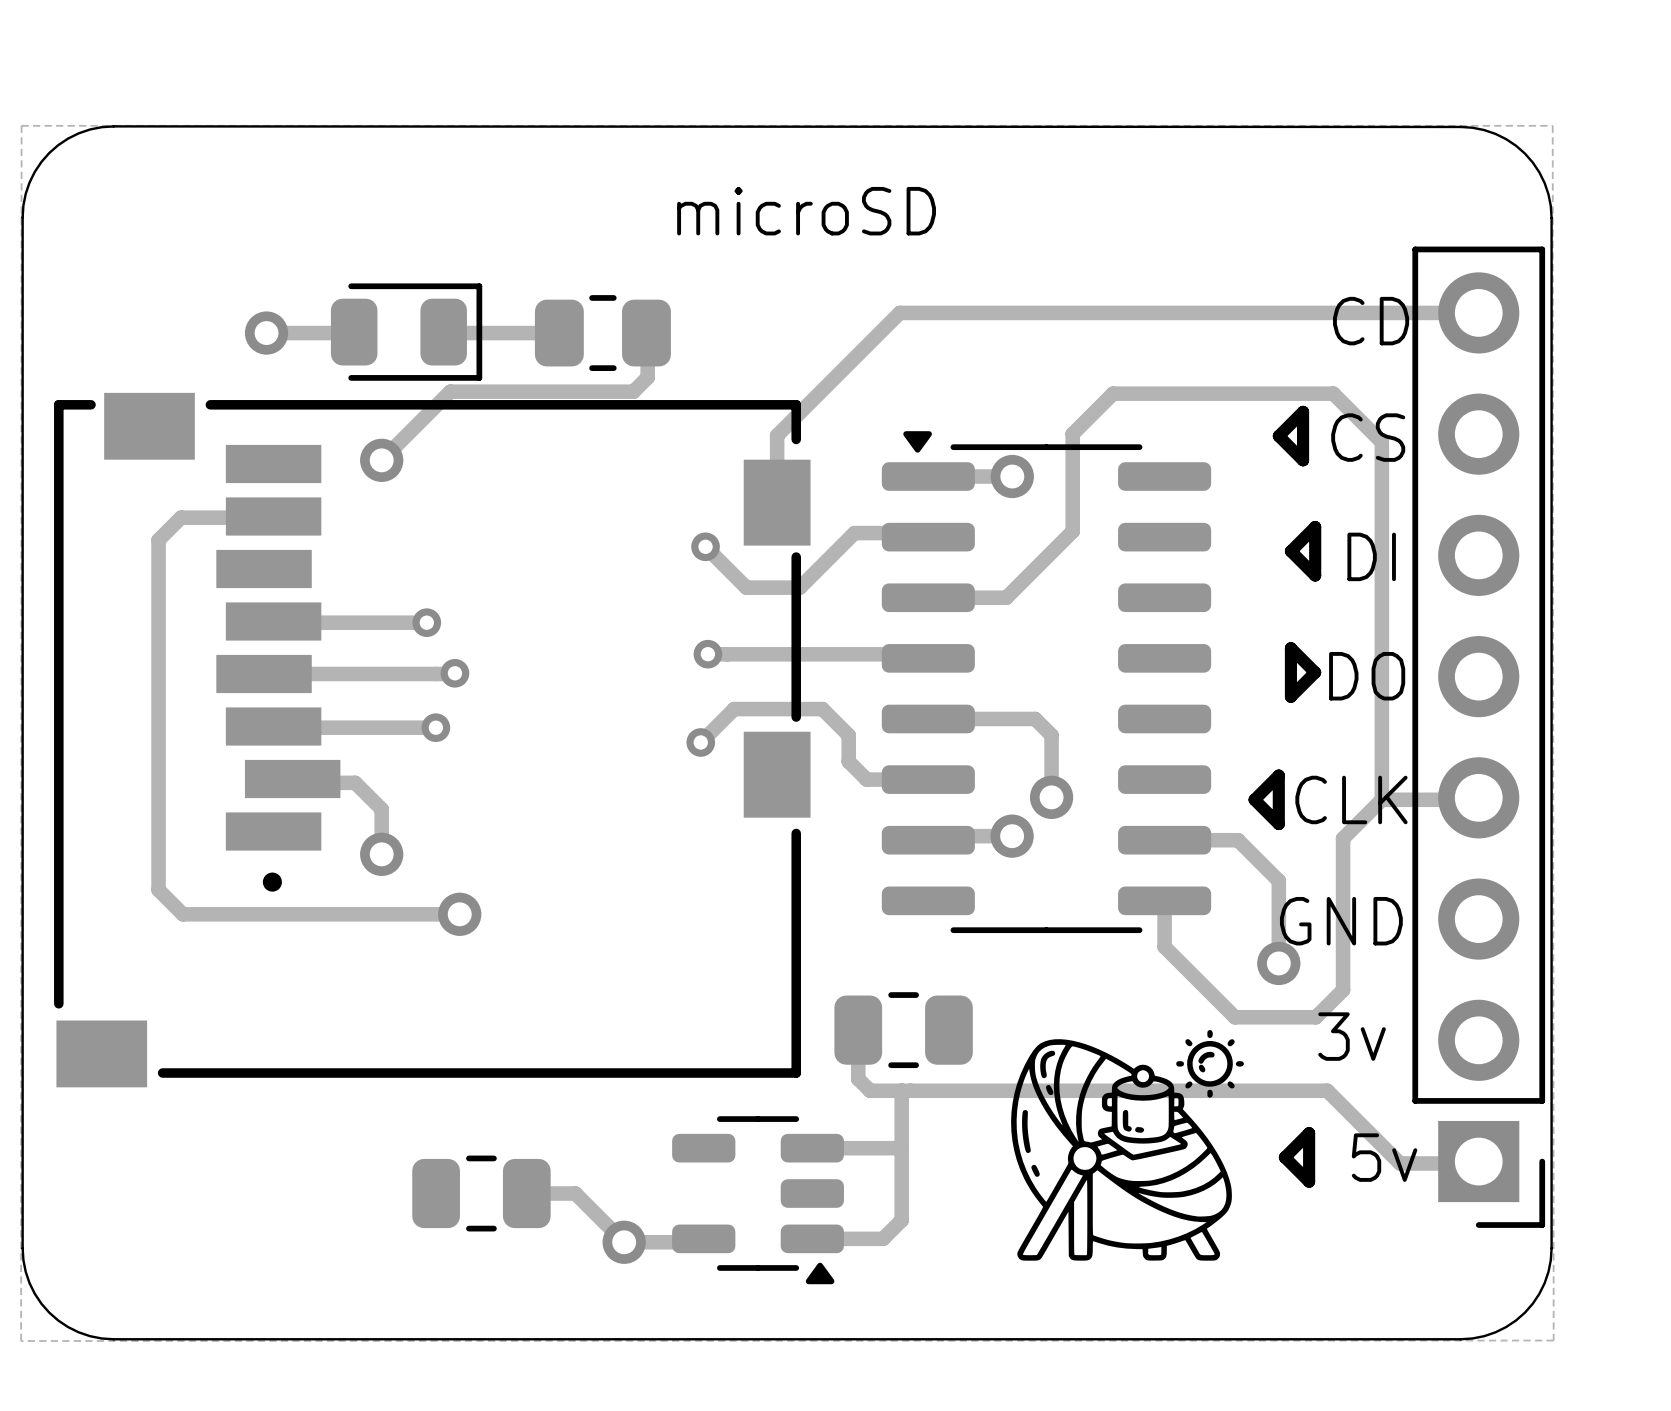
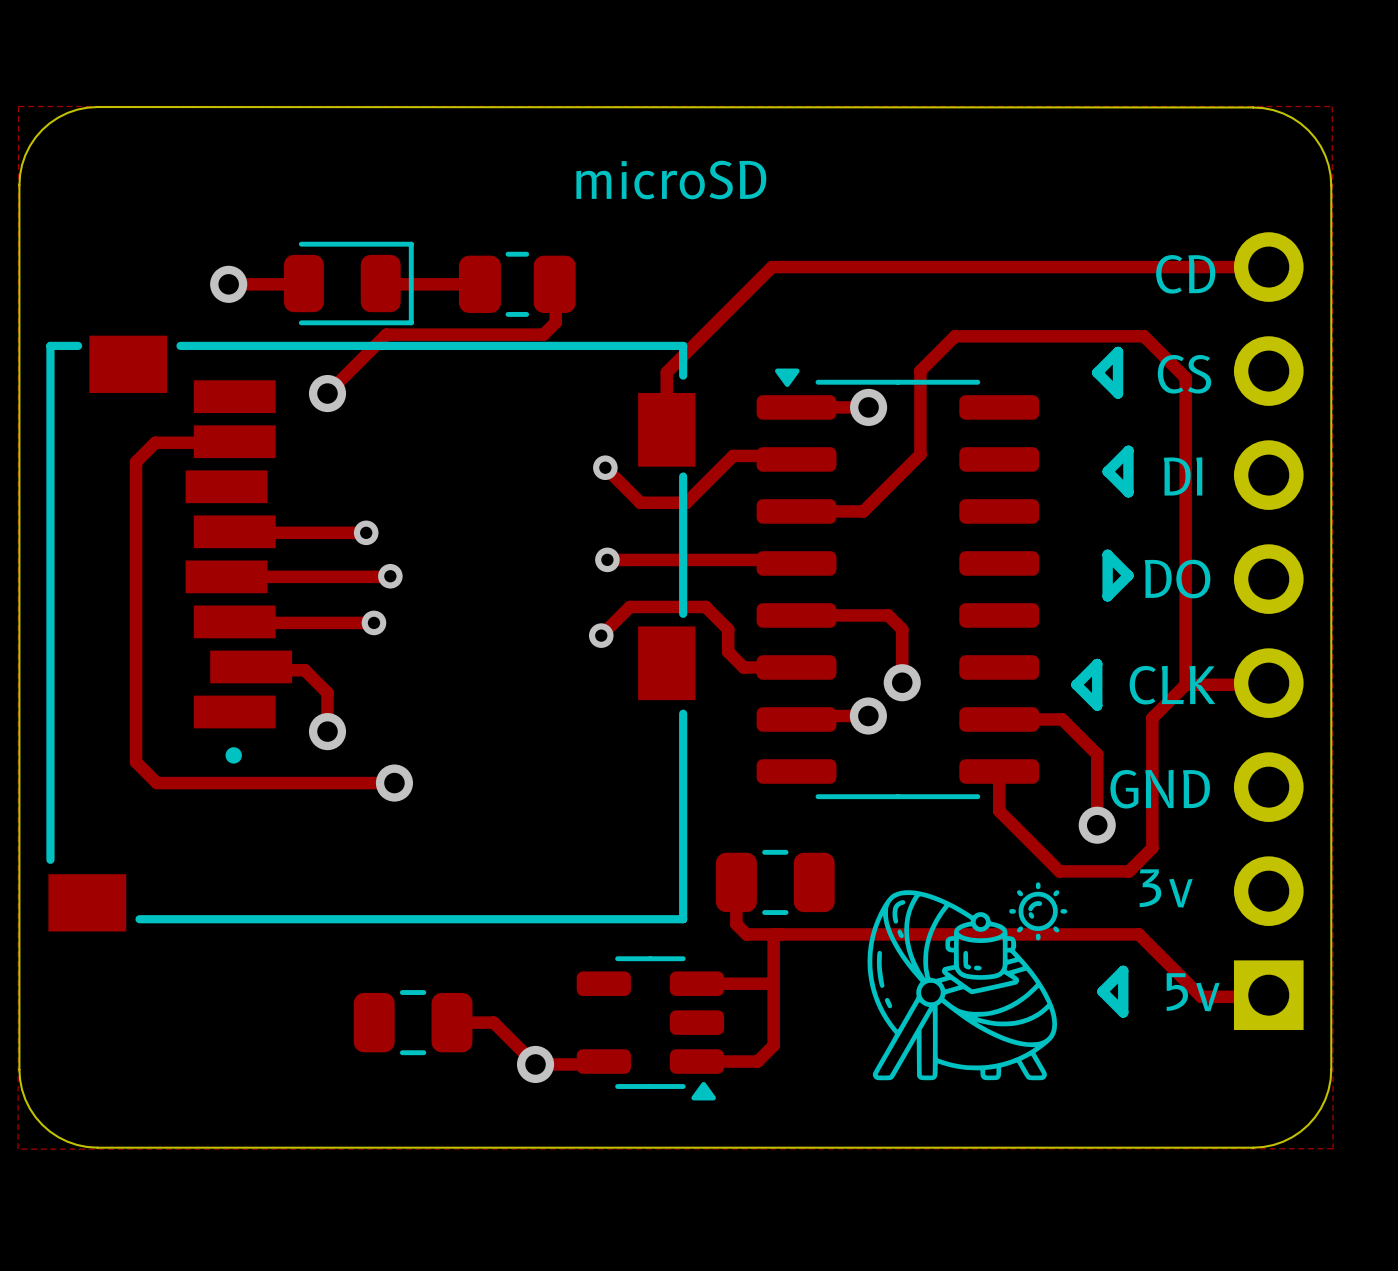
part side: top (1478, 737) -> bottom (1268, 631)

